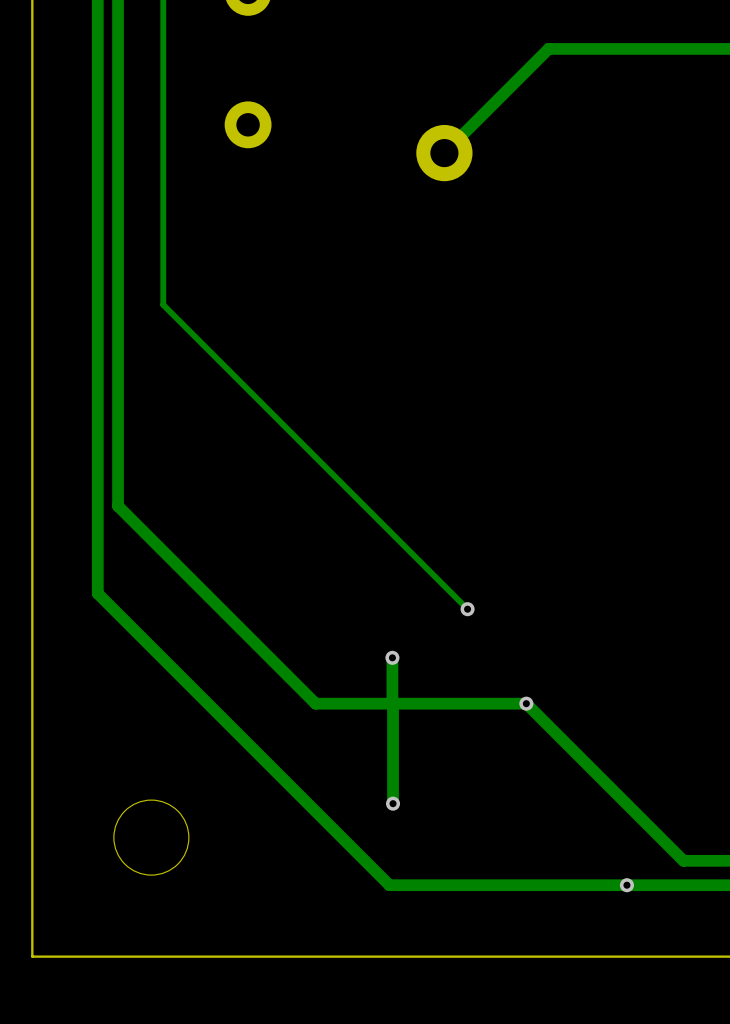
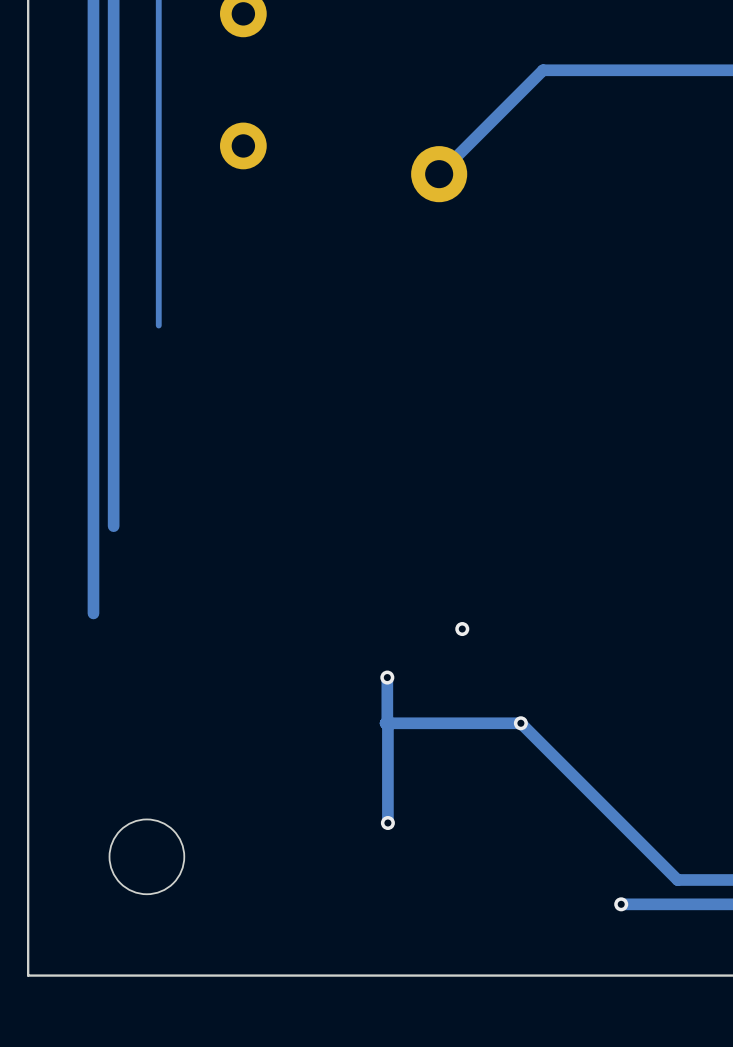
track: (163, 304) (467, 609) -> none
track: (118, 506) (315, 703) (390, 703) -> none
track: (97, 593) (389, 885) (626, 885) -> none

